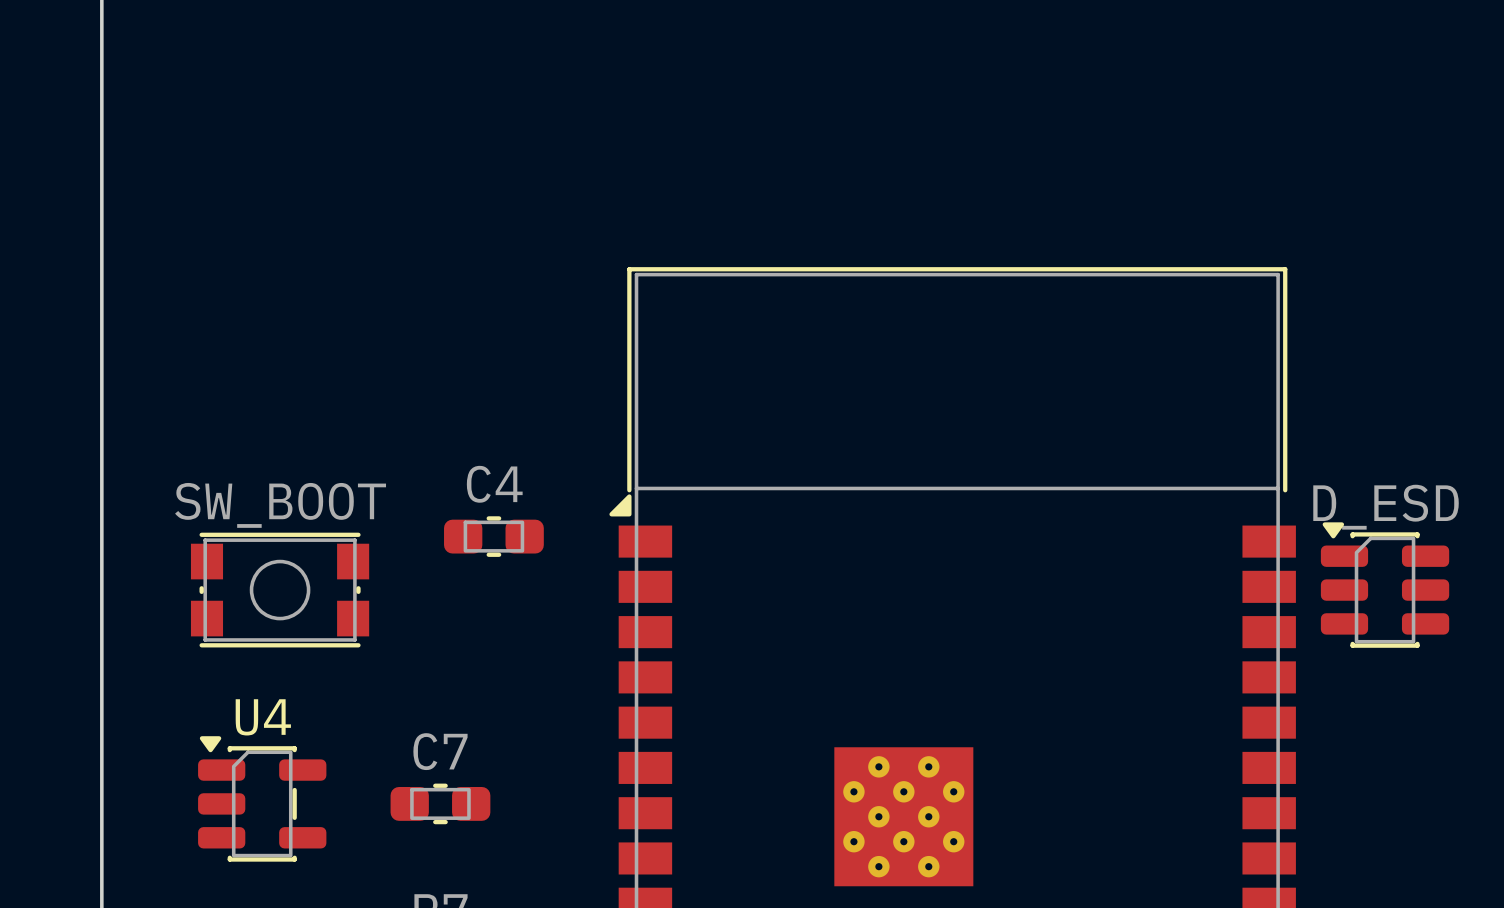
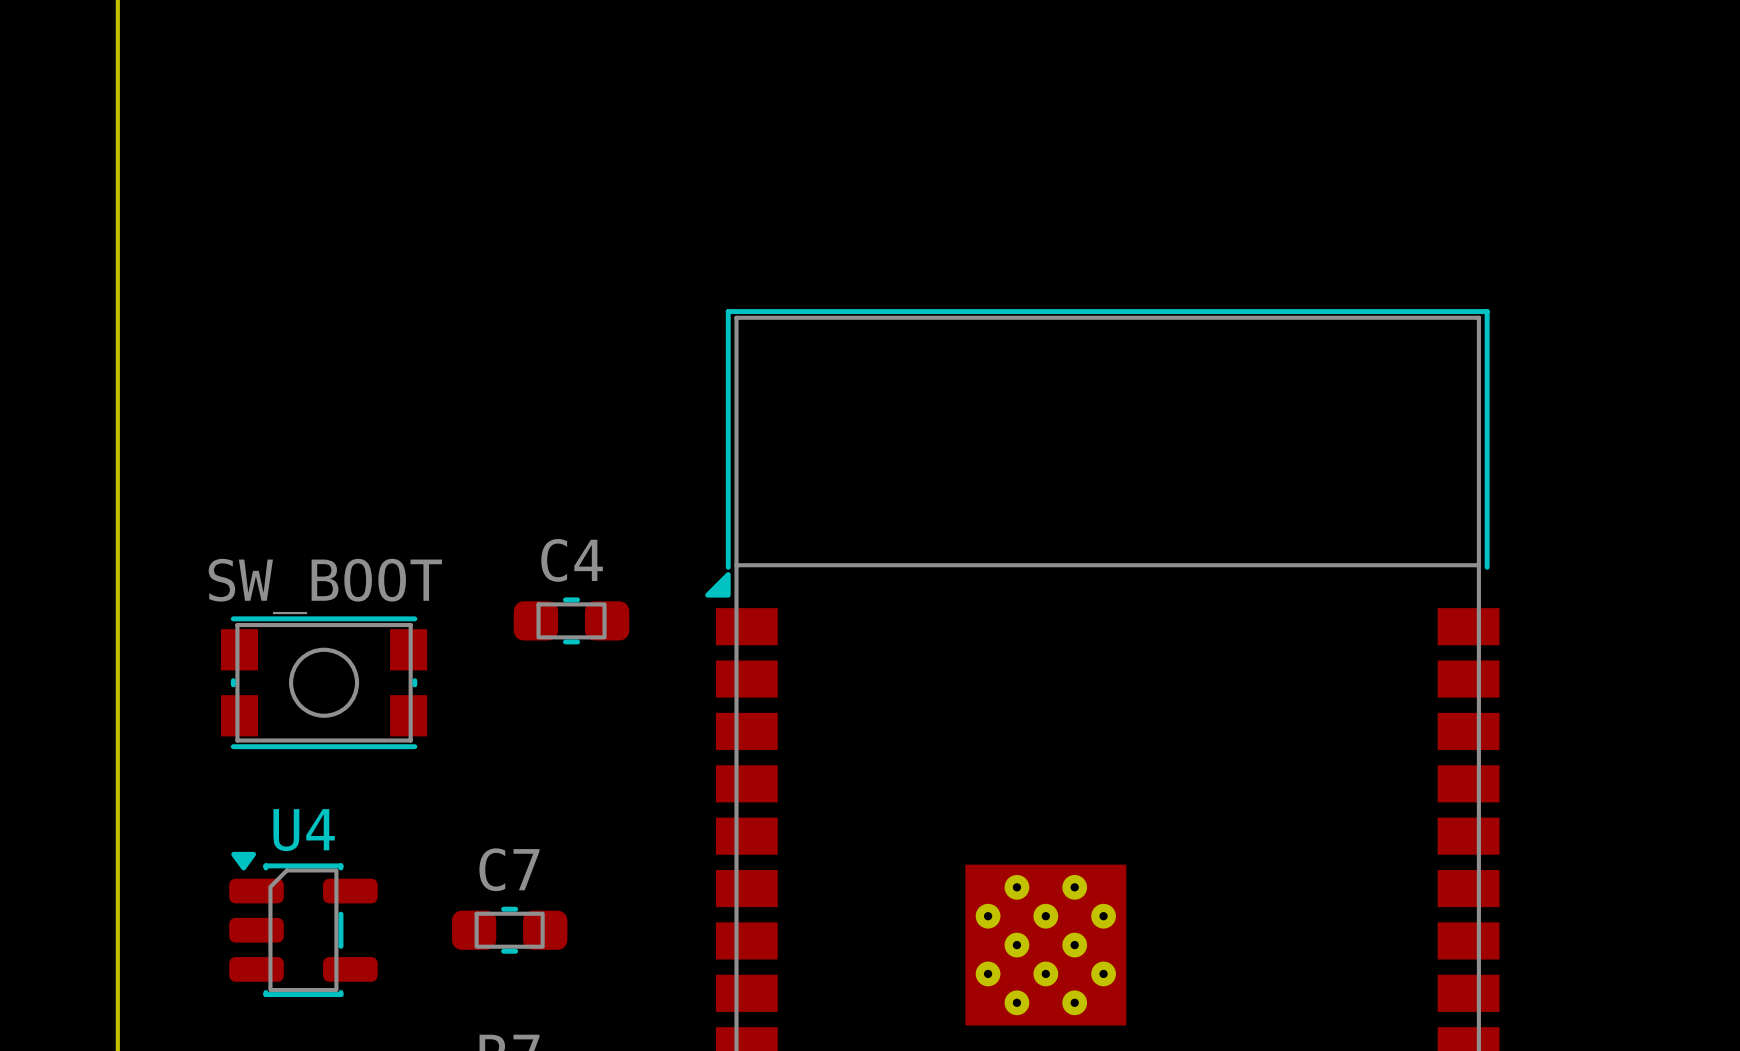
D_ESD: (1385, 585) -> none

